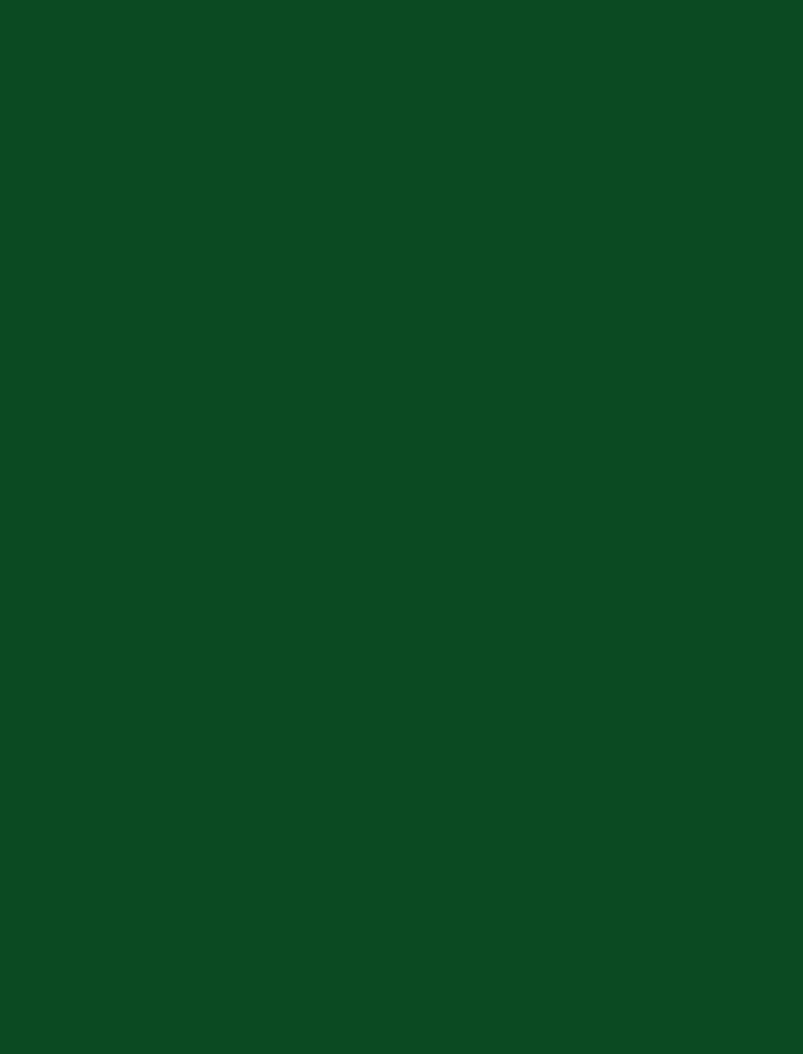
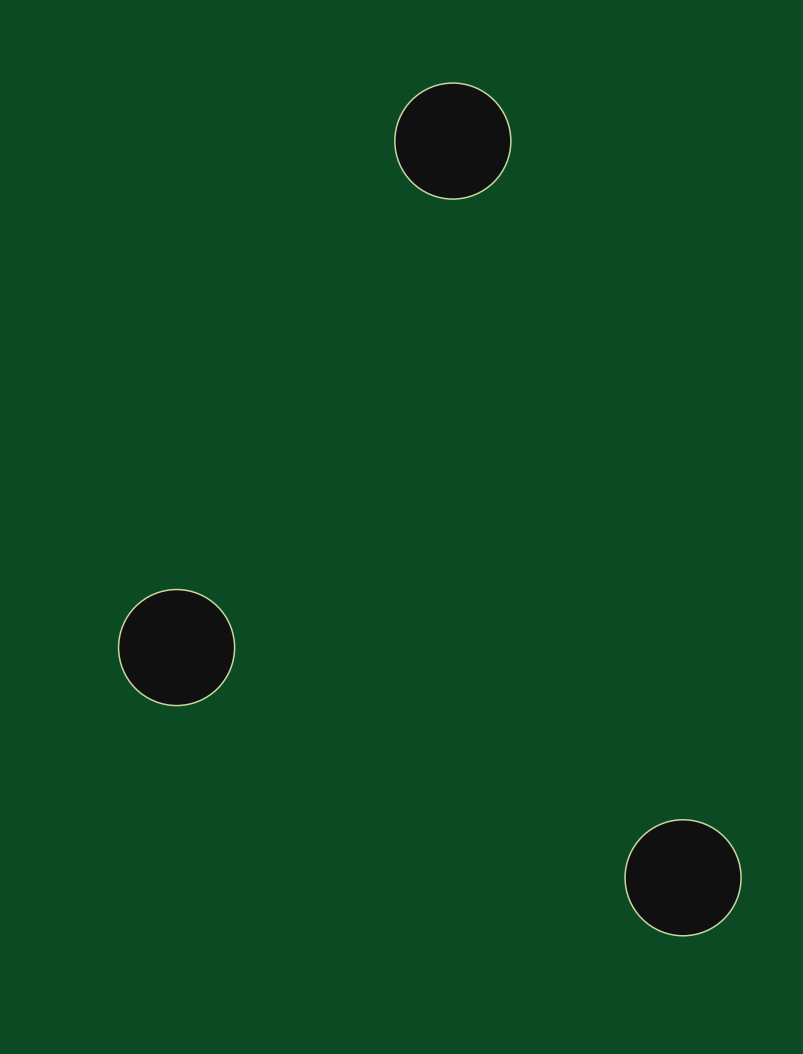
part: none -> (452, 141)
part: none -> (176, 647)
part: none -> (683, 877)

